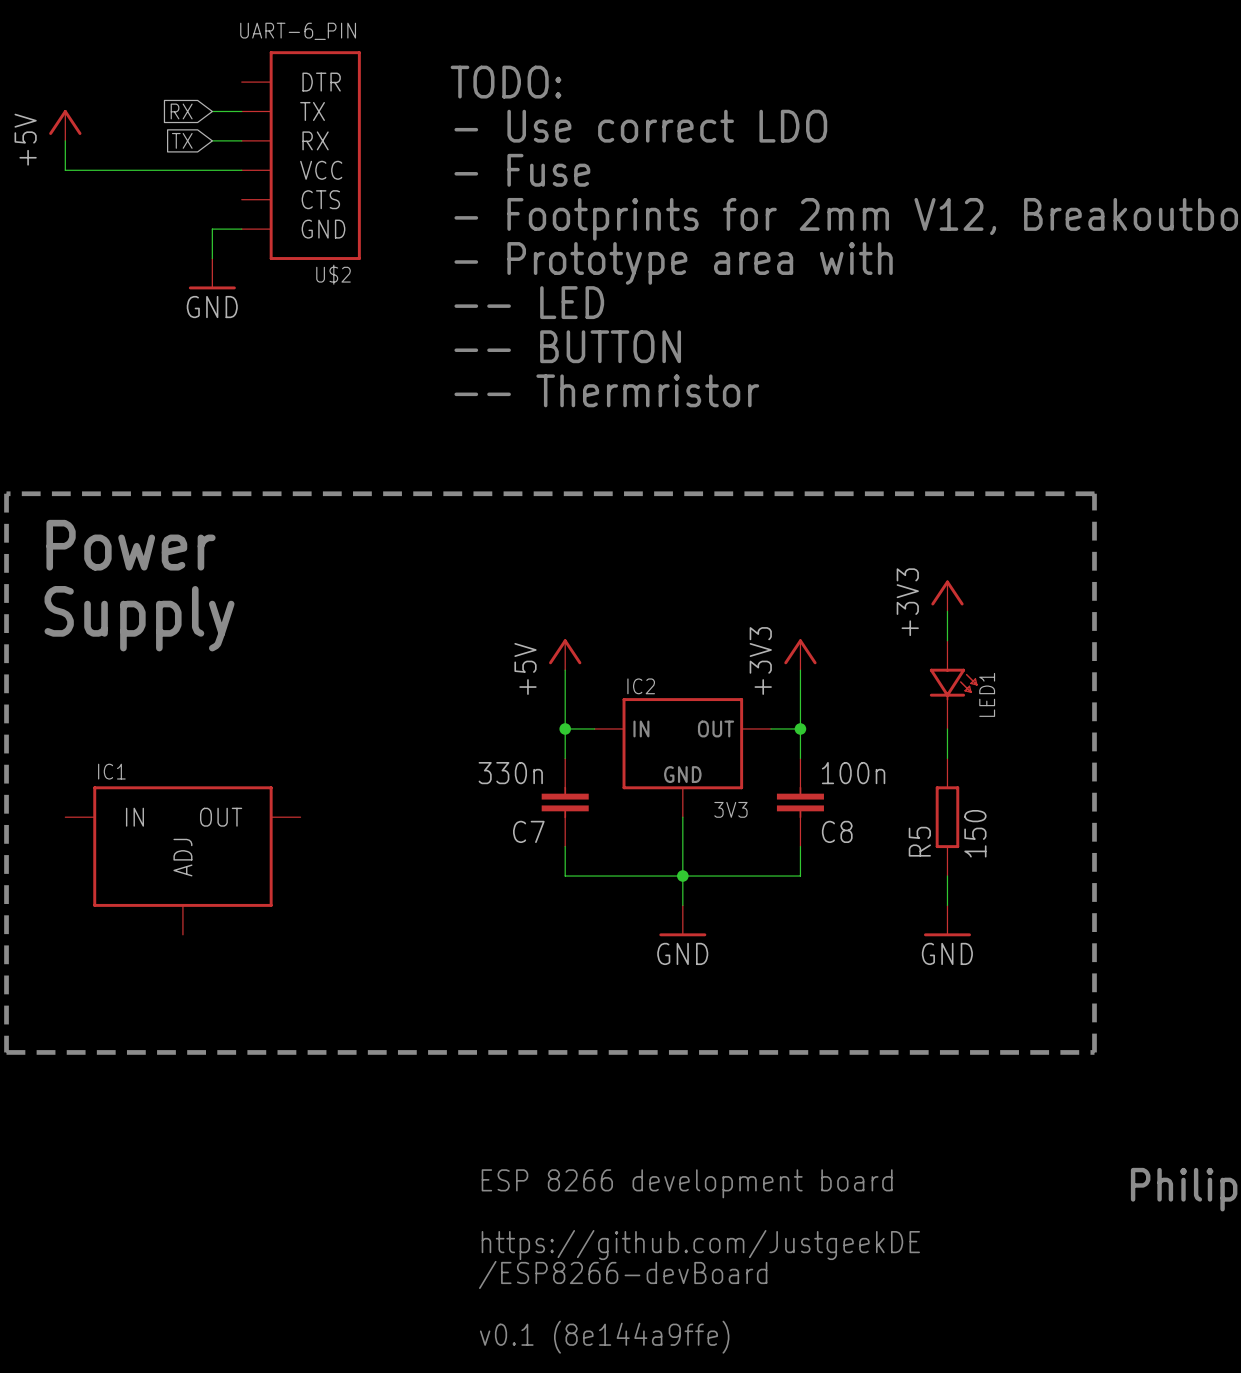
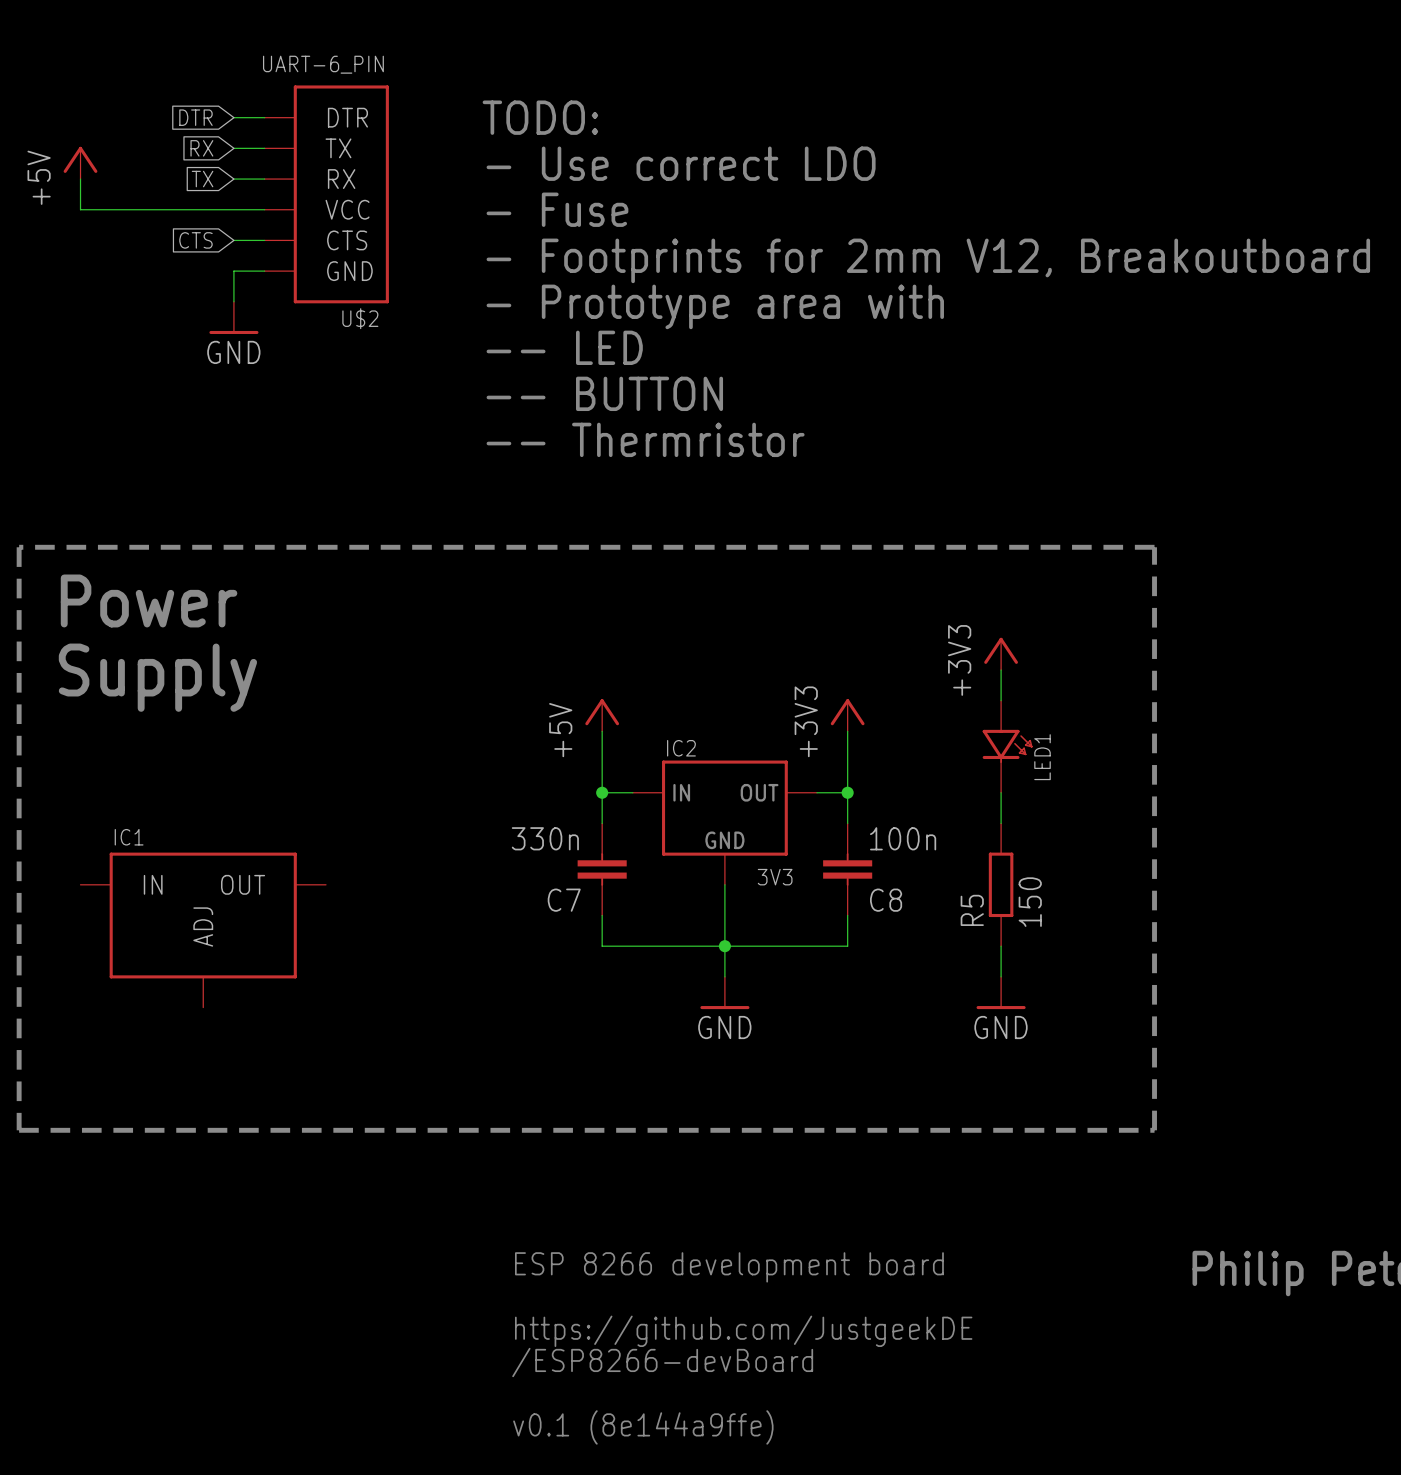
global label: none -> DTR (195, 117)
wire: none -> (233, 117) (264, 117)
global label: none -> CTS (195, 240)
wire: none -> (233, 240) (264, 240)

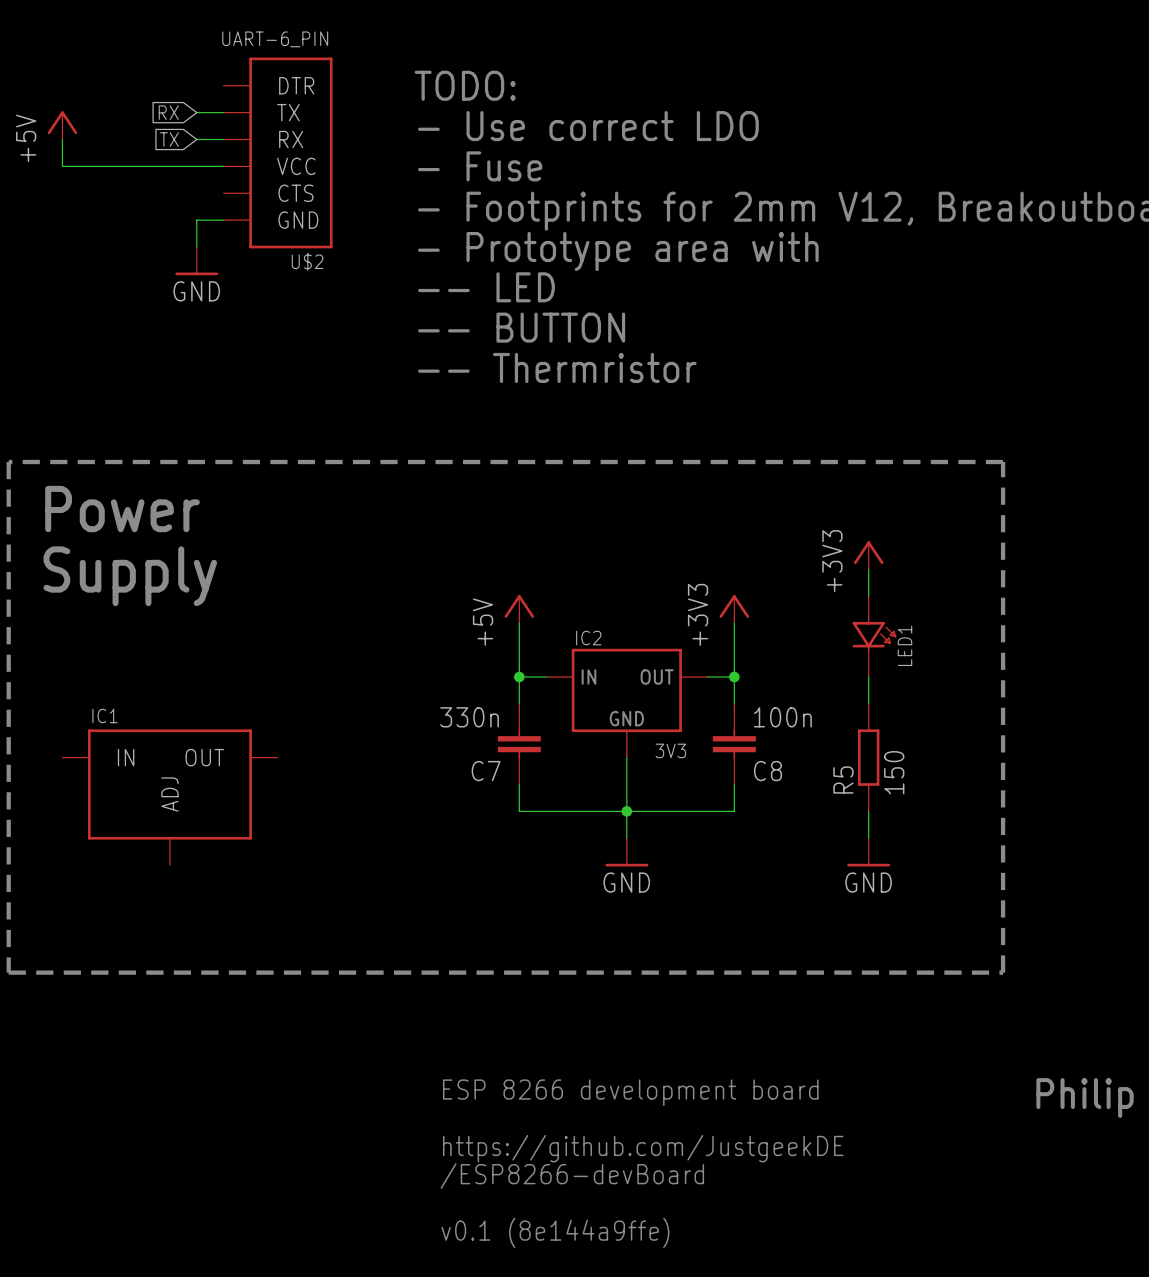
global label: DTR (195, 117) -> none
wire: (233, 117) (264, 117) -> none
global label: CTS (195, 240) -> none
wire: (233, 240) (264, 240) -> none

